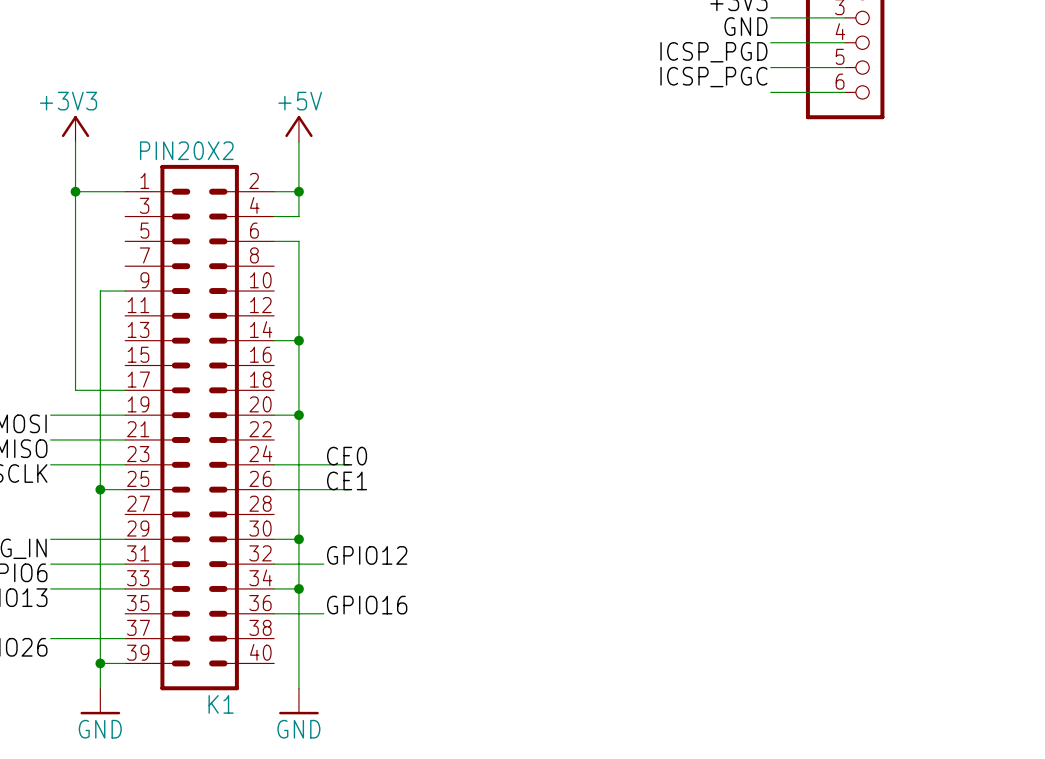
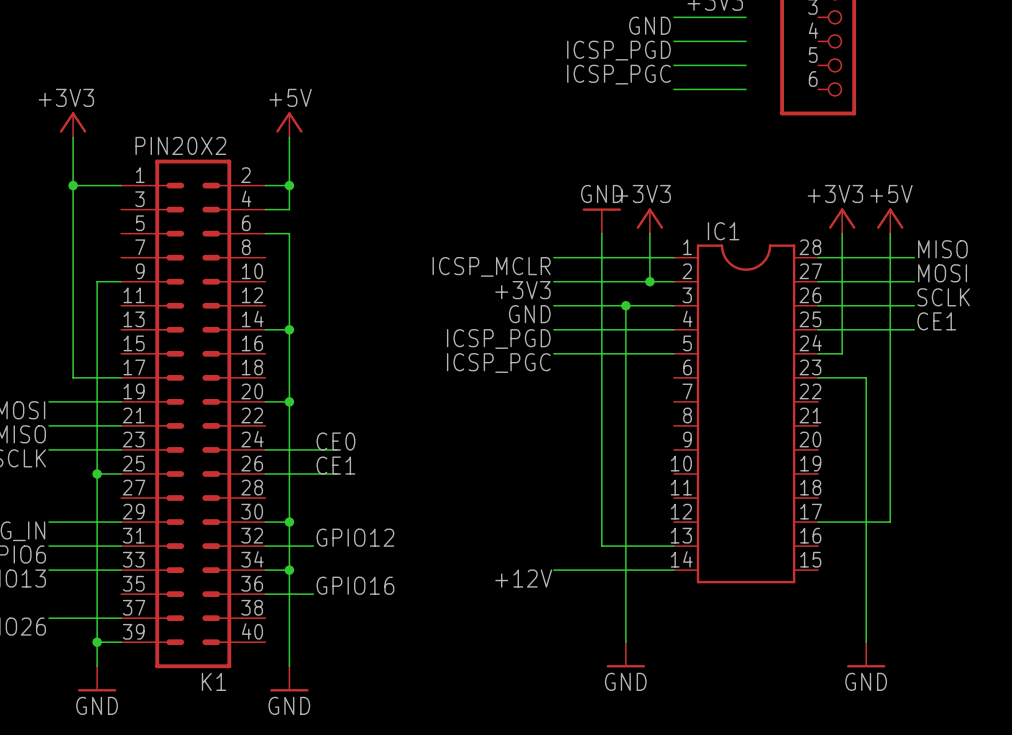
wire: (770, 17) (845, 17) -> (746, 17) (673, 17)
label position: GND (745, 26) -> GND (649, 25)
wire: (770, 42) (845, 42) -> (746, 41) (673, 41)
label position: ICSP_PGD (713, 52) -> ICSP_PGD (618, 50)
wire: (770, 67) (845, 67) -> (746, 65) (673, 65)
label position: ICSP_PGC (713, 77) -> ICSP_PGC (618, 74)
wire: (770, 92) (845, 92) -> (746, 89) (673, 89)
power symbol: none -> GND (601, 221)
power symbol: none -> +3V3 (649, 221)
power symbol: none -> +3V3 (842, 221)
power symbol: none -> +5V (890, 221)
wire: none -> (601, 233) (601, 546) (673, 546)
wire: none -> (649, 233) (649, 281)
wire: none -> (842, 233) (842, 353) (818, 353)
wire: none -> (890, 233) (890, 522) (818, 522)
label: none -> MISO (942, 249)
wire: none -> (553, 257) (673, 257)
wire: none -> (818, 257) (914, 257)
label: none -> ICSP_MCLR (491, 266)
label: none -> MOSI (942, 273)
wire: none -> (553, 281) (673, 281)
junction: none -> (649, 281)
wire: none -> (818, 281) (914, 281)
label: none -> +3V3 (522, 290)
label: none -> SCLK (943, 297)
wire: none -> (553, 305) (673, 305)
wire: none -> (625, 305) (625, 642)
junction: none -> (625, 305)
wire: none -> (818, 305) (914, 305)
label: none -> GND (529, 314)
label: none -> CE1 (936, 321)
wire: none -> (553, 329) (673, 329)
wire: none -> (818, 329) (914, 329)
label: none -> ICSP_PGD (498, 338)
wire: none -> (553, 353) (673, 353)
label: none -> ICSP_PGC (498, 363)
wire: none -> (818, 377) (866, 377) (866, 642)
IC1: none -> (746, 413)
wire: none -> (553, 570) (673, 570)
label: none -> +12V (523, 578)
power symbol: none -> GND (625, 654)
power symbol: none -> GND (866, 654)

